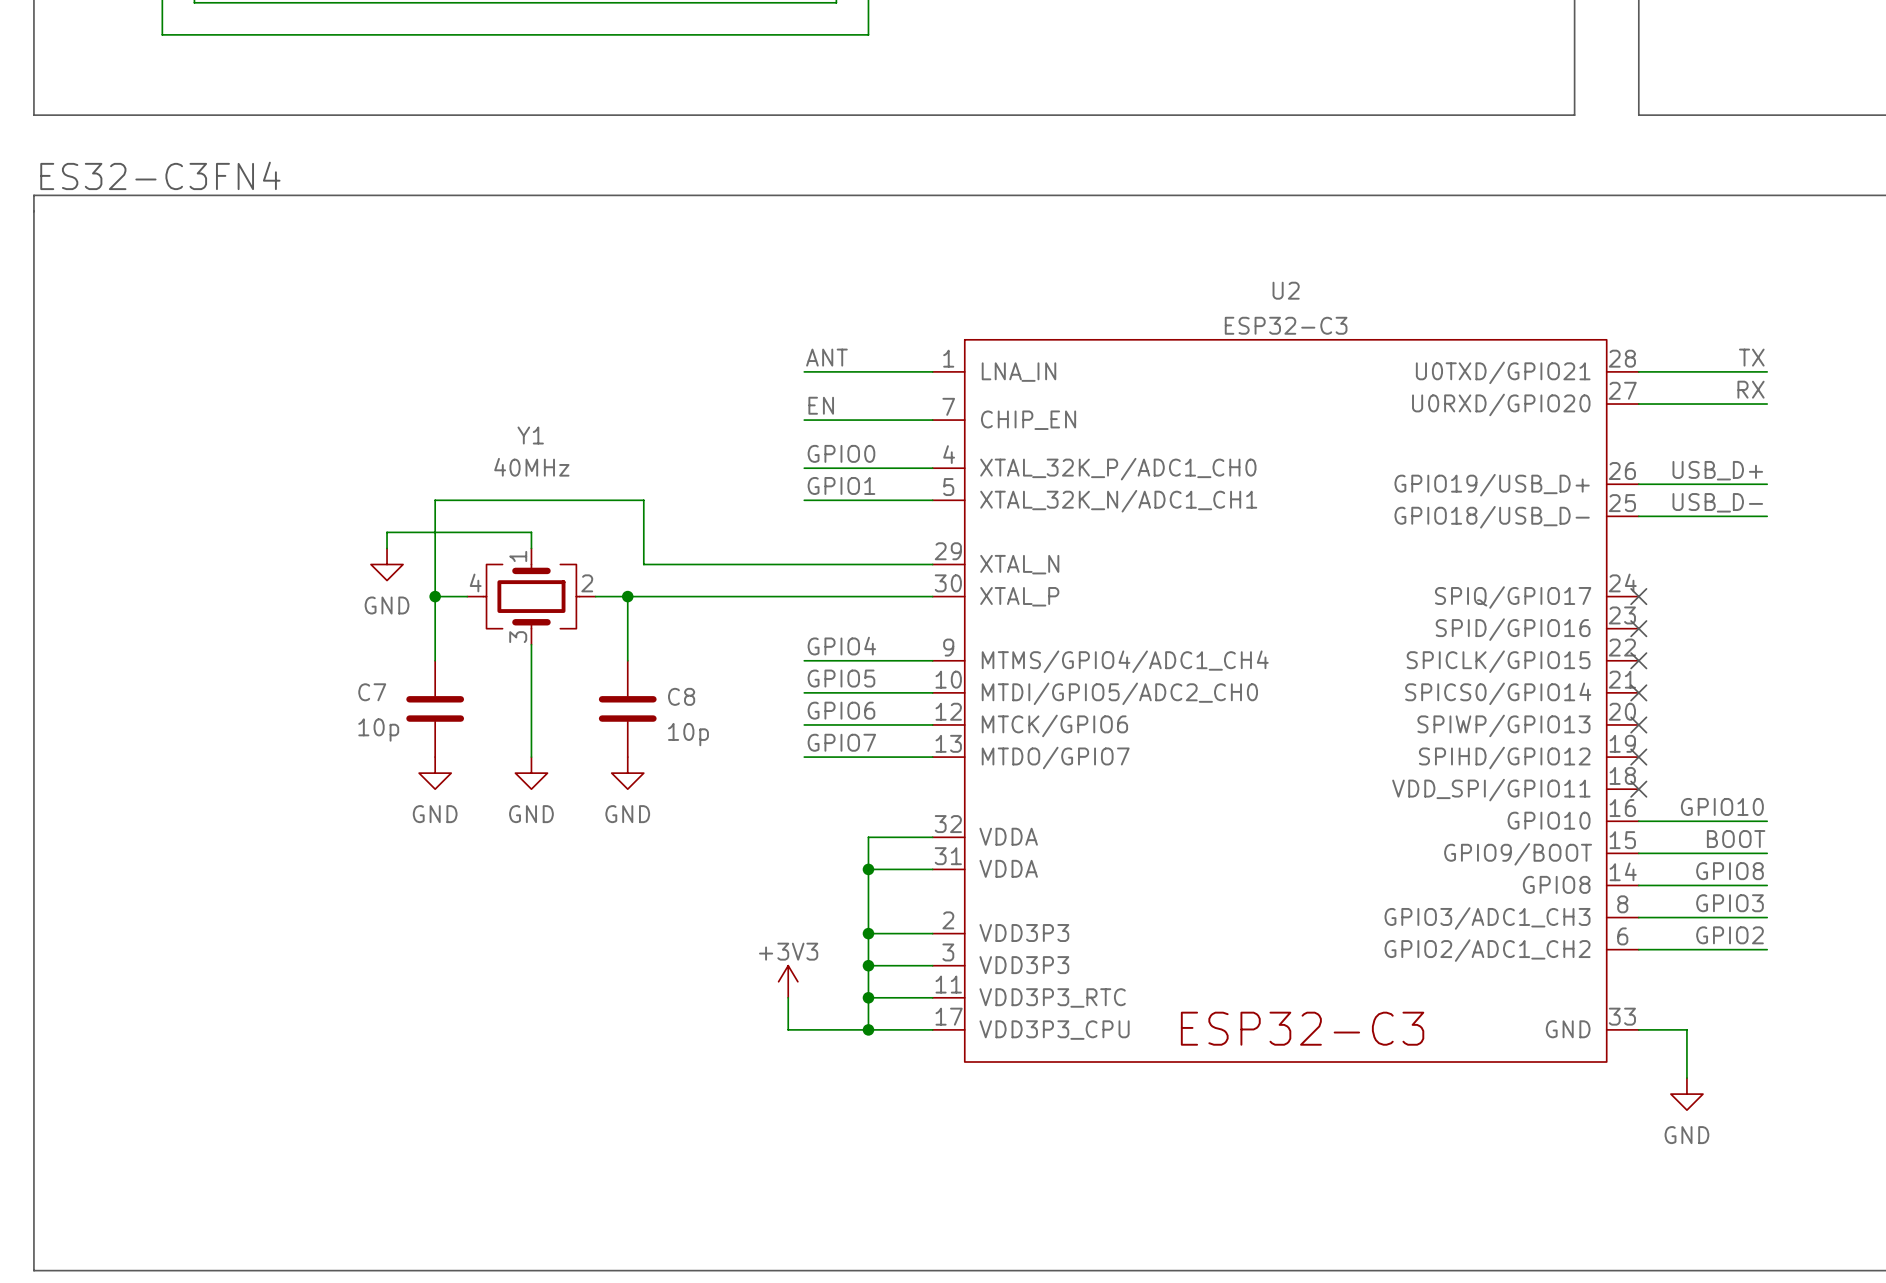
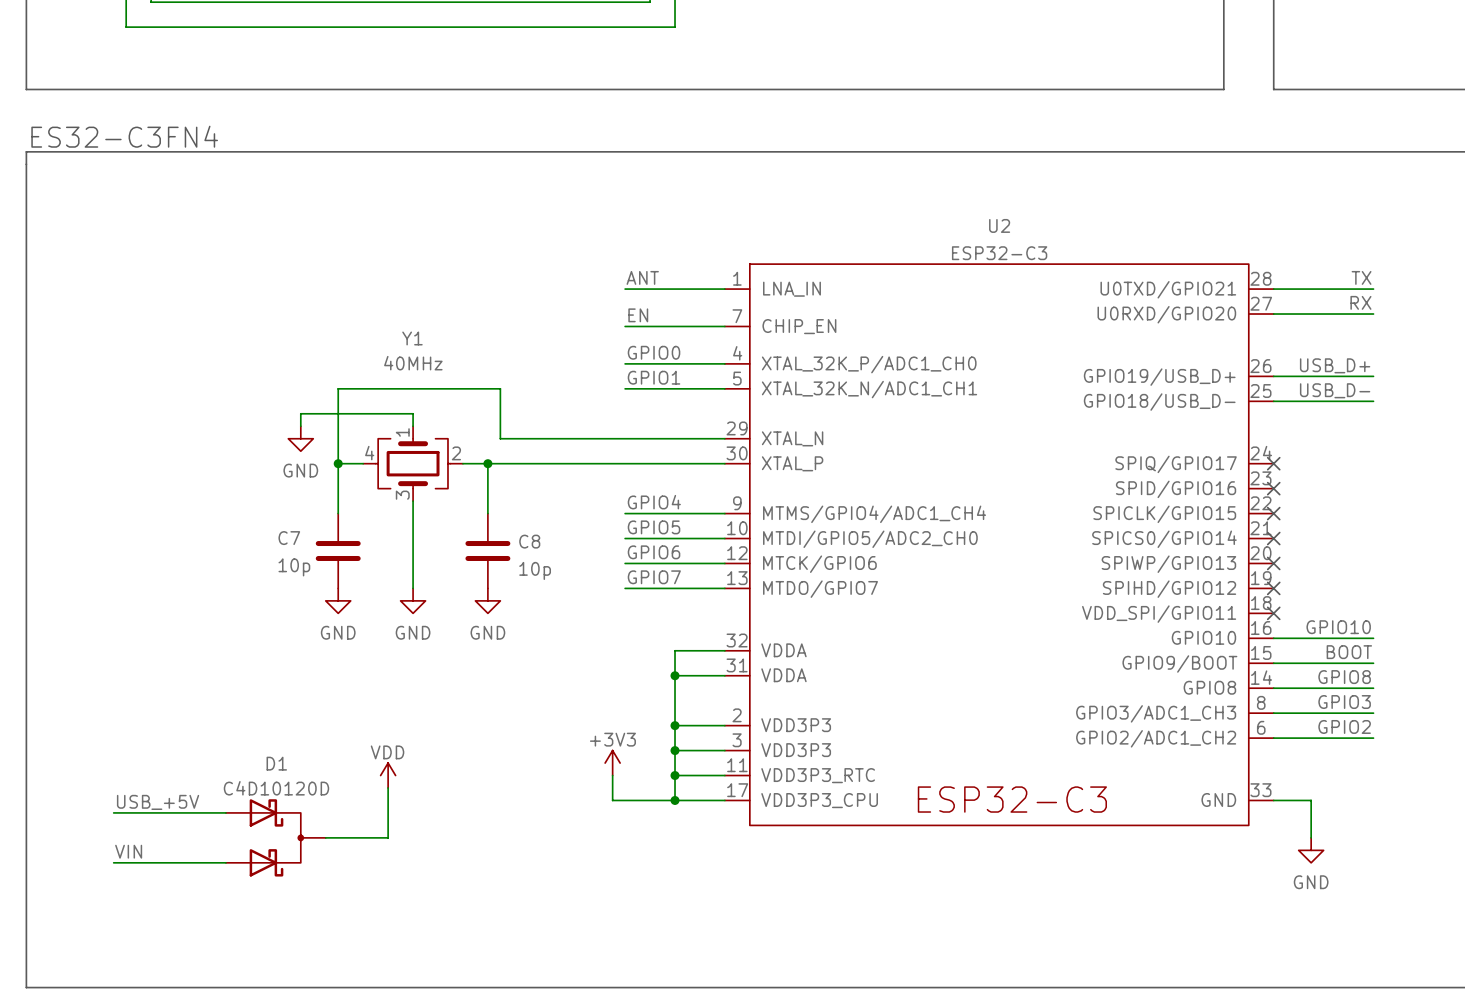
power symbol: none -> VDD (388, 775)
wire: none -> (388, 787) (388, 837) (325, 837)
label: none -> USB_+5V (158, 802)
wire: none -> (113, 812) (225, 812)
D1: none -> C4D10120D (275, 837)
label: none -> VIN (128, 851)
wire: none -> (113, 862) (225, 862)

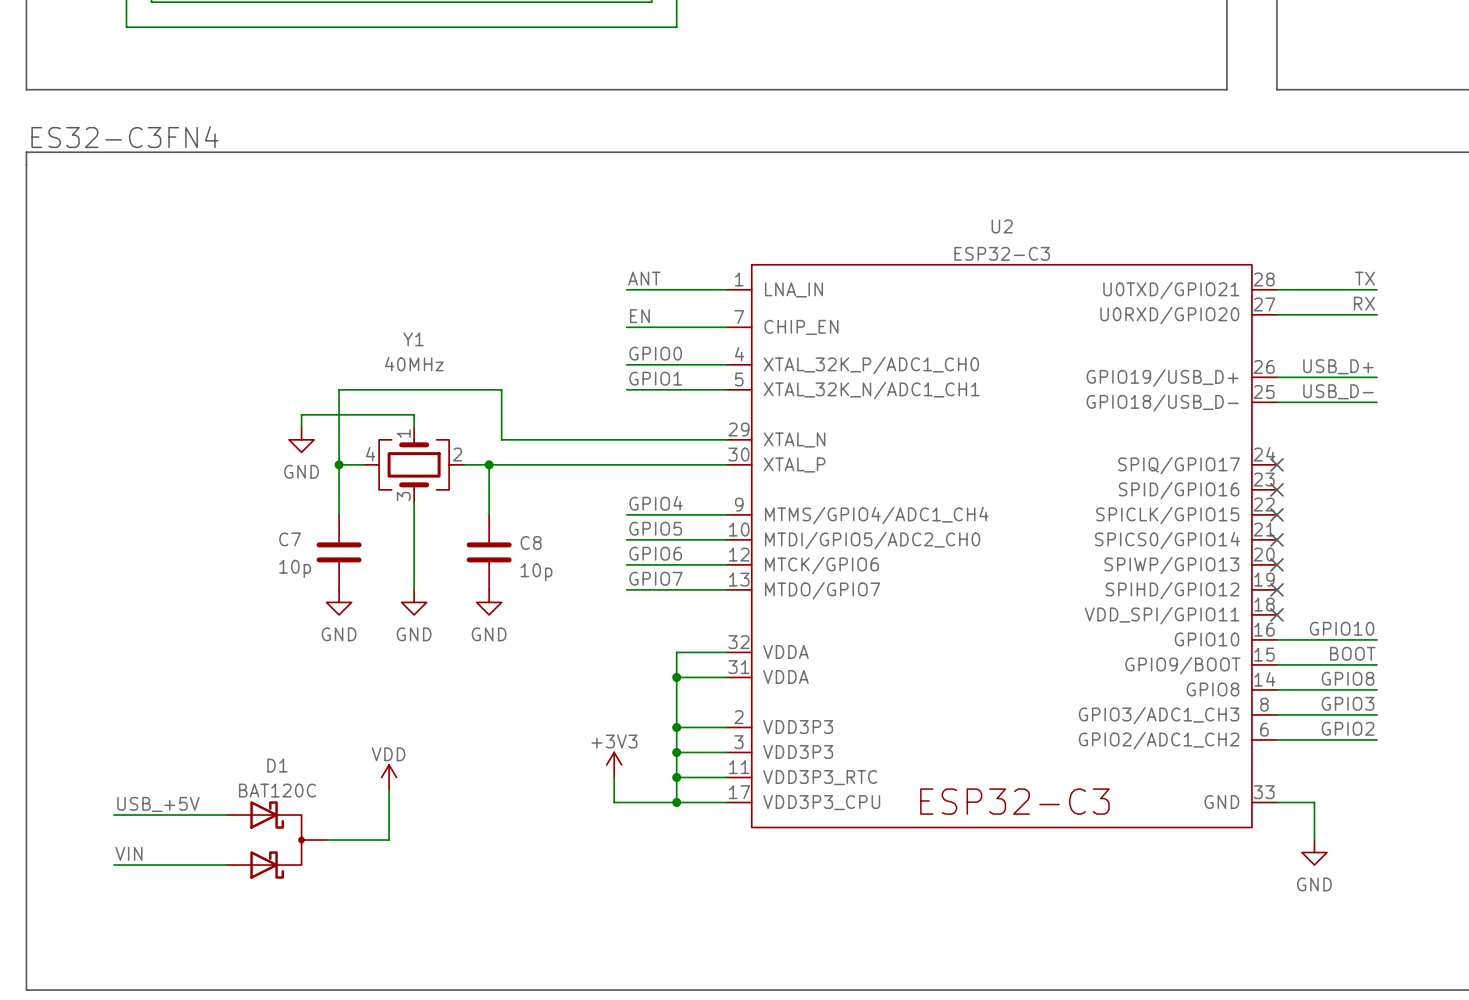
D1 value: C4D10120D (276, 788) -> BAT120C (277, 790)

